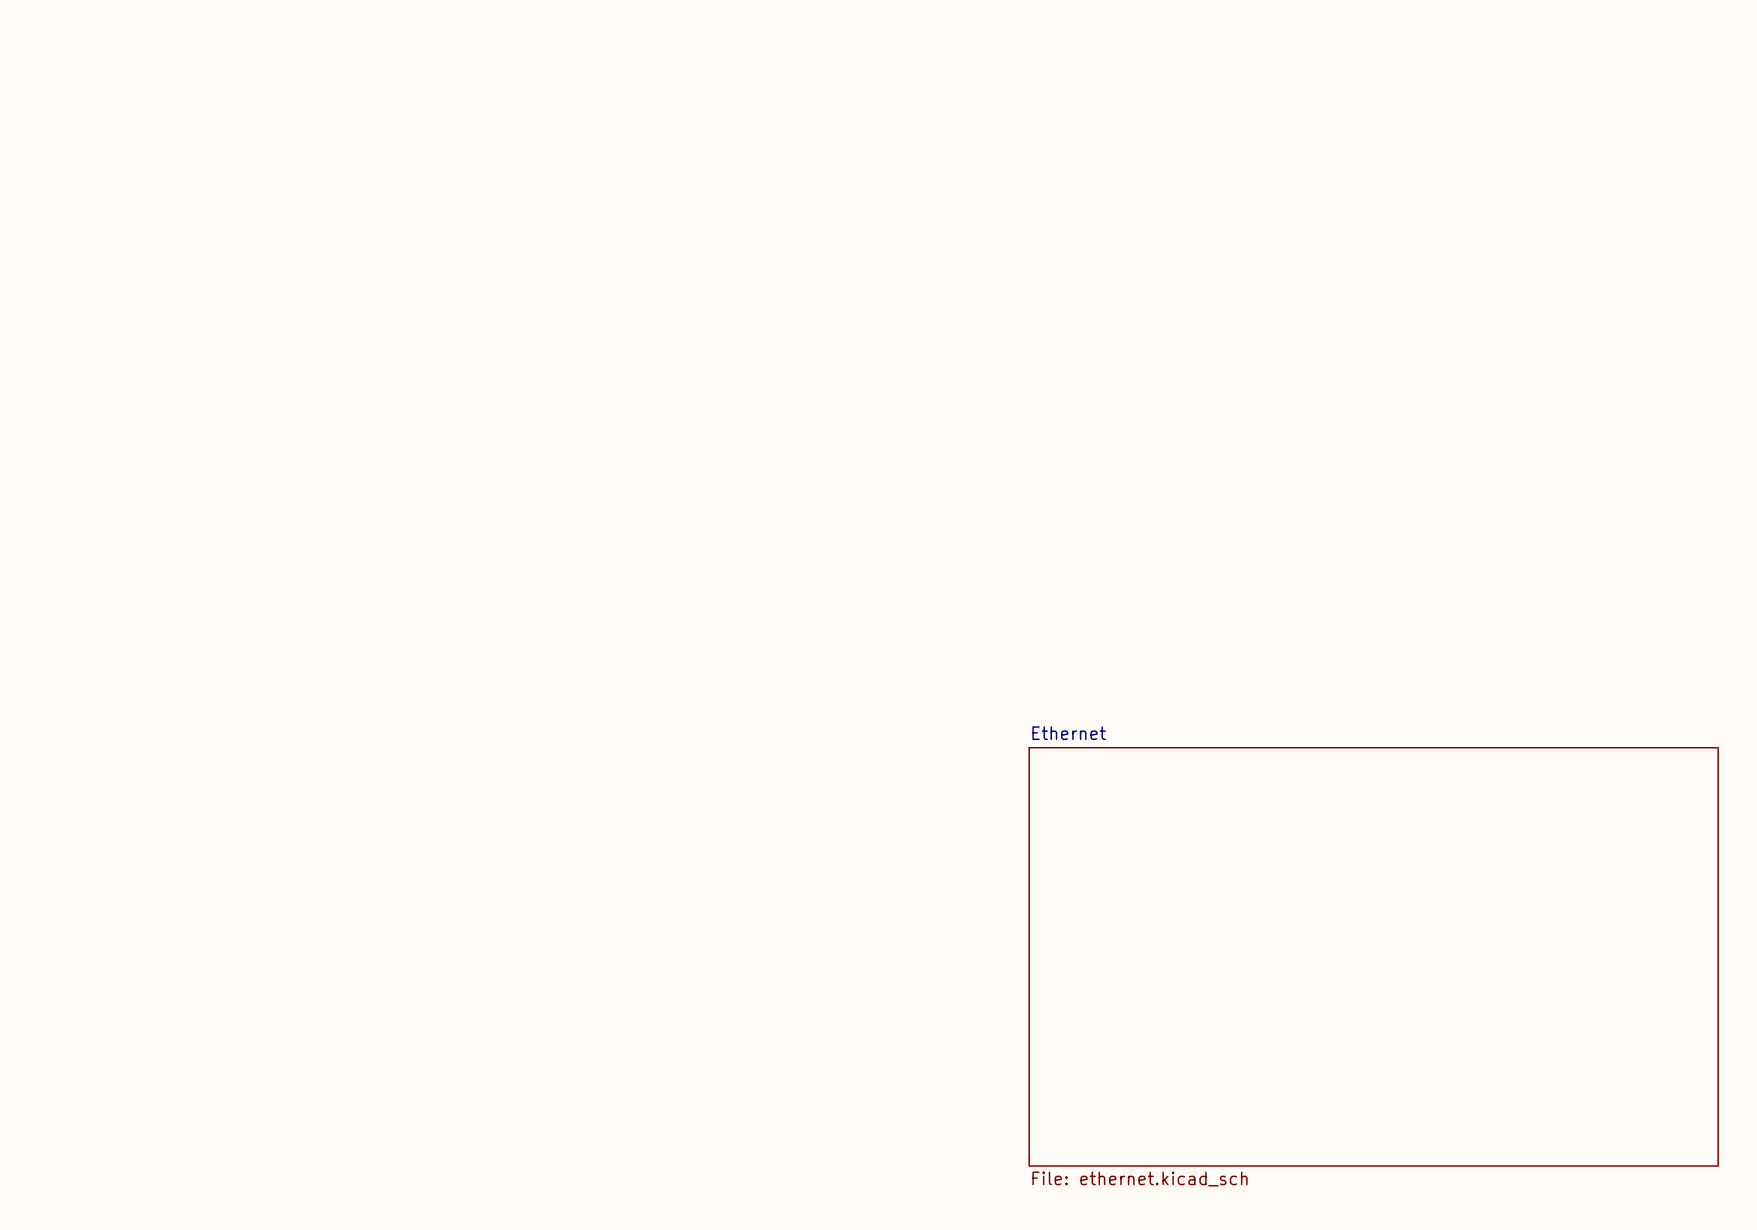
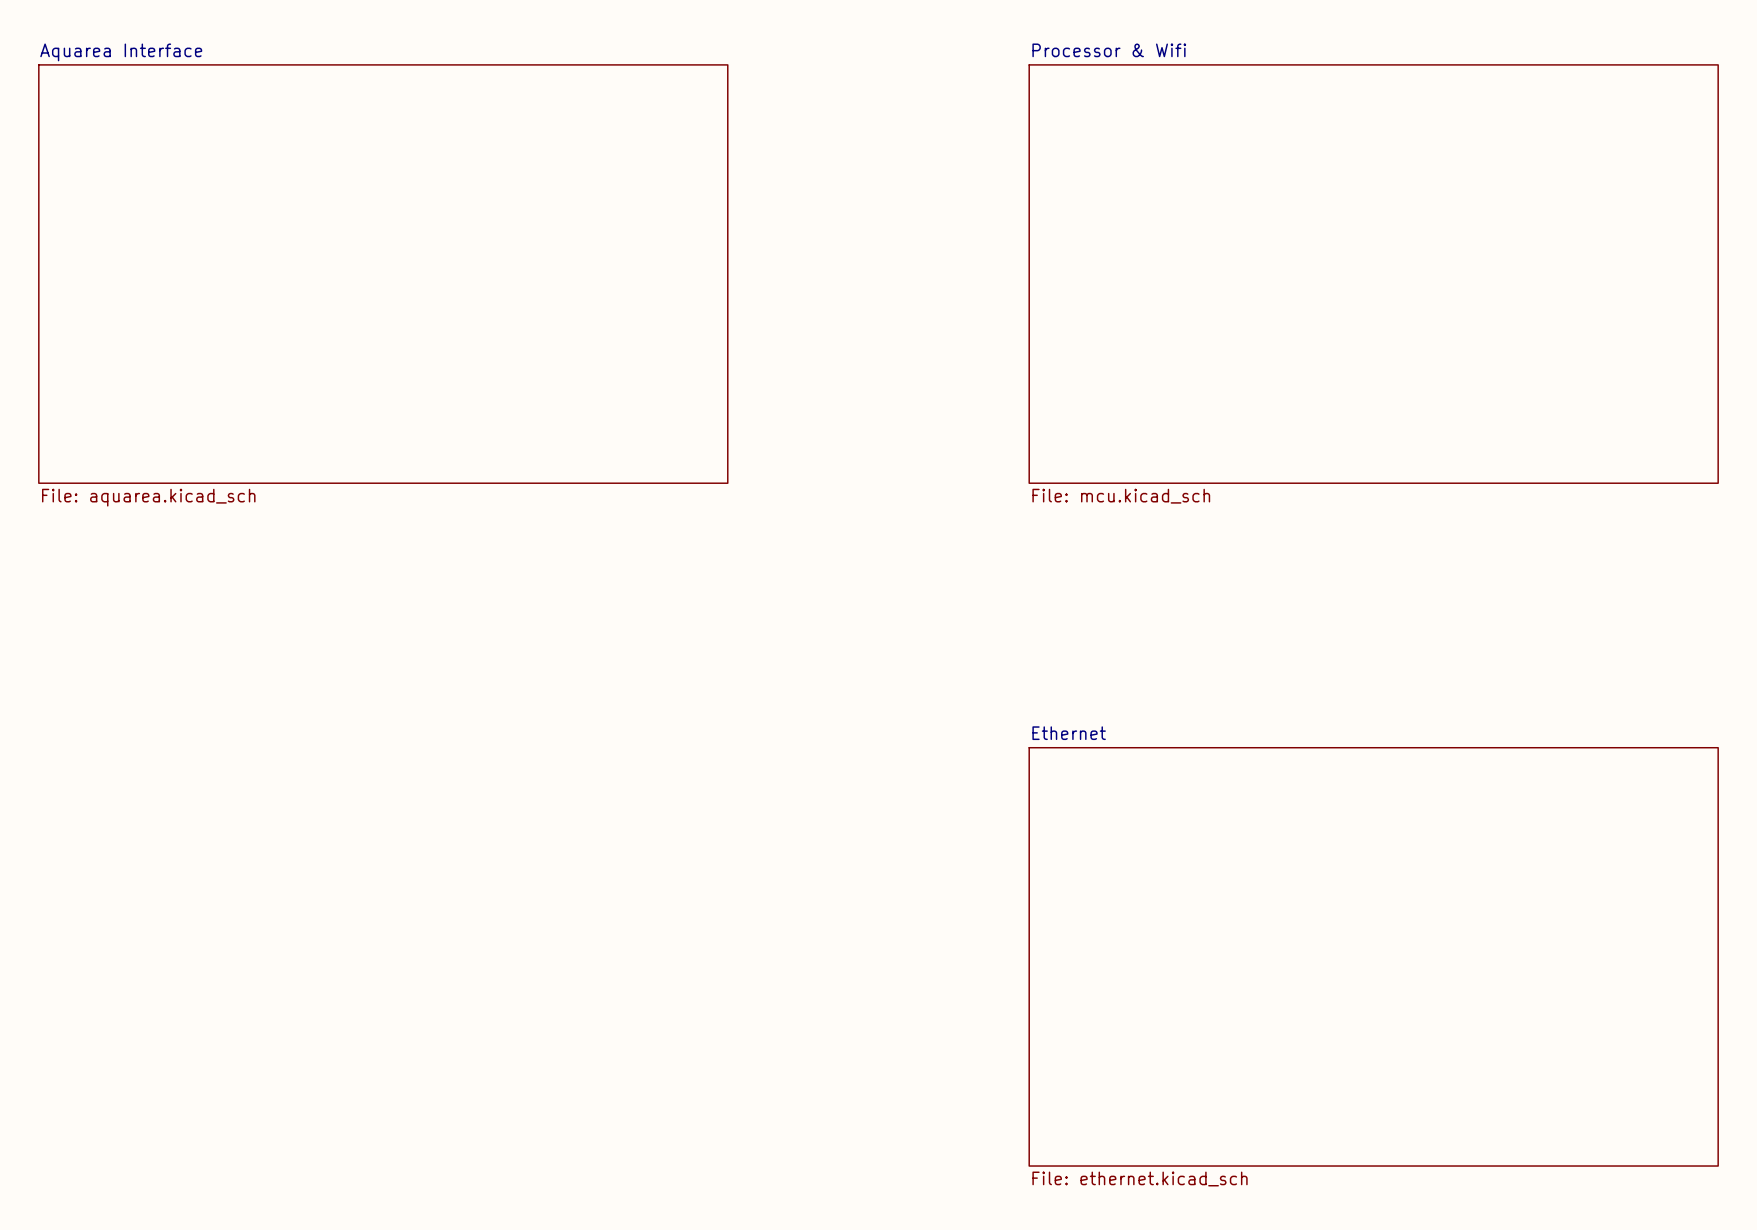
sheet Aquarea Interface: none -> File: aquarea.kicad_sch (383, 274)
sheet Processor & Wifi: none -> File: mcu.kicad_sch (1373, 274)

